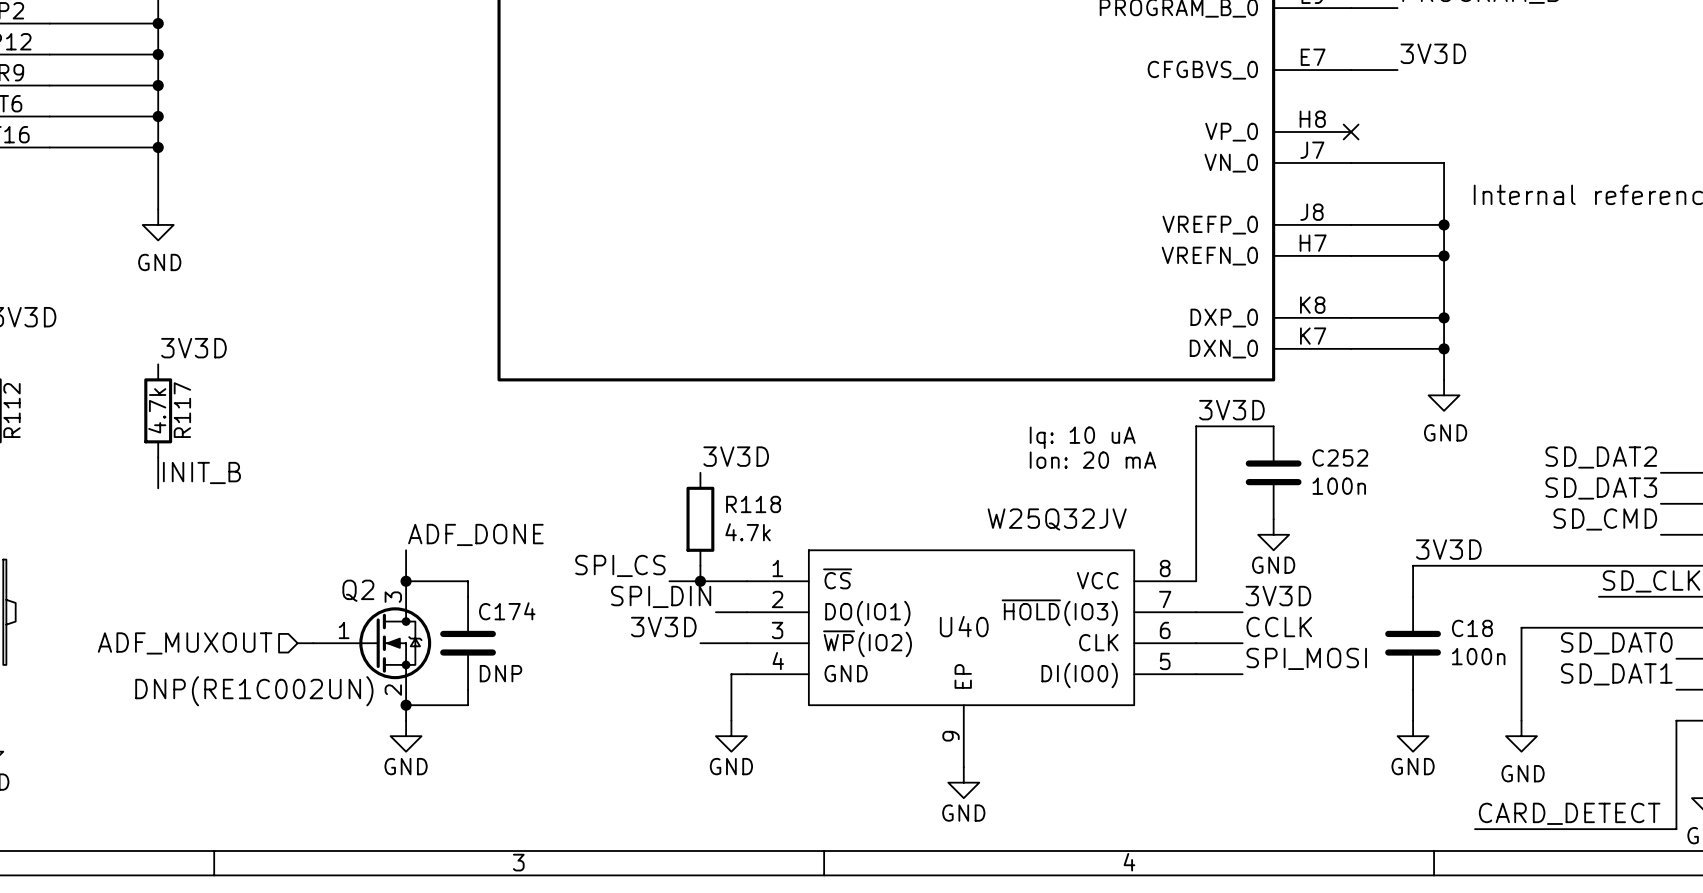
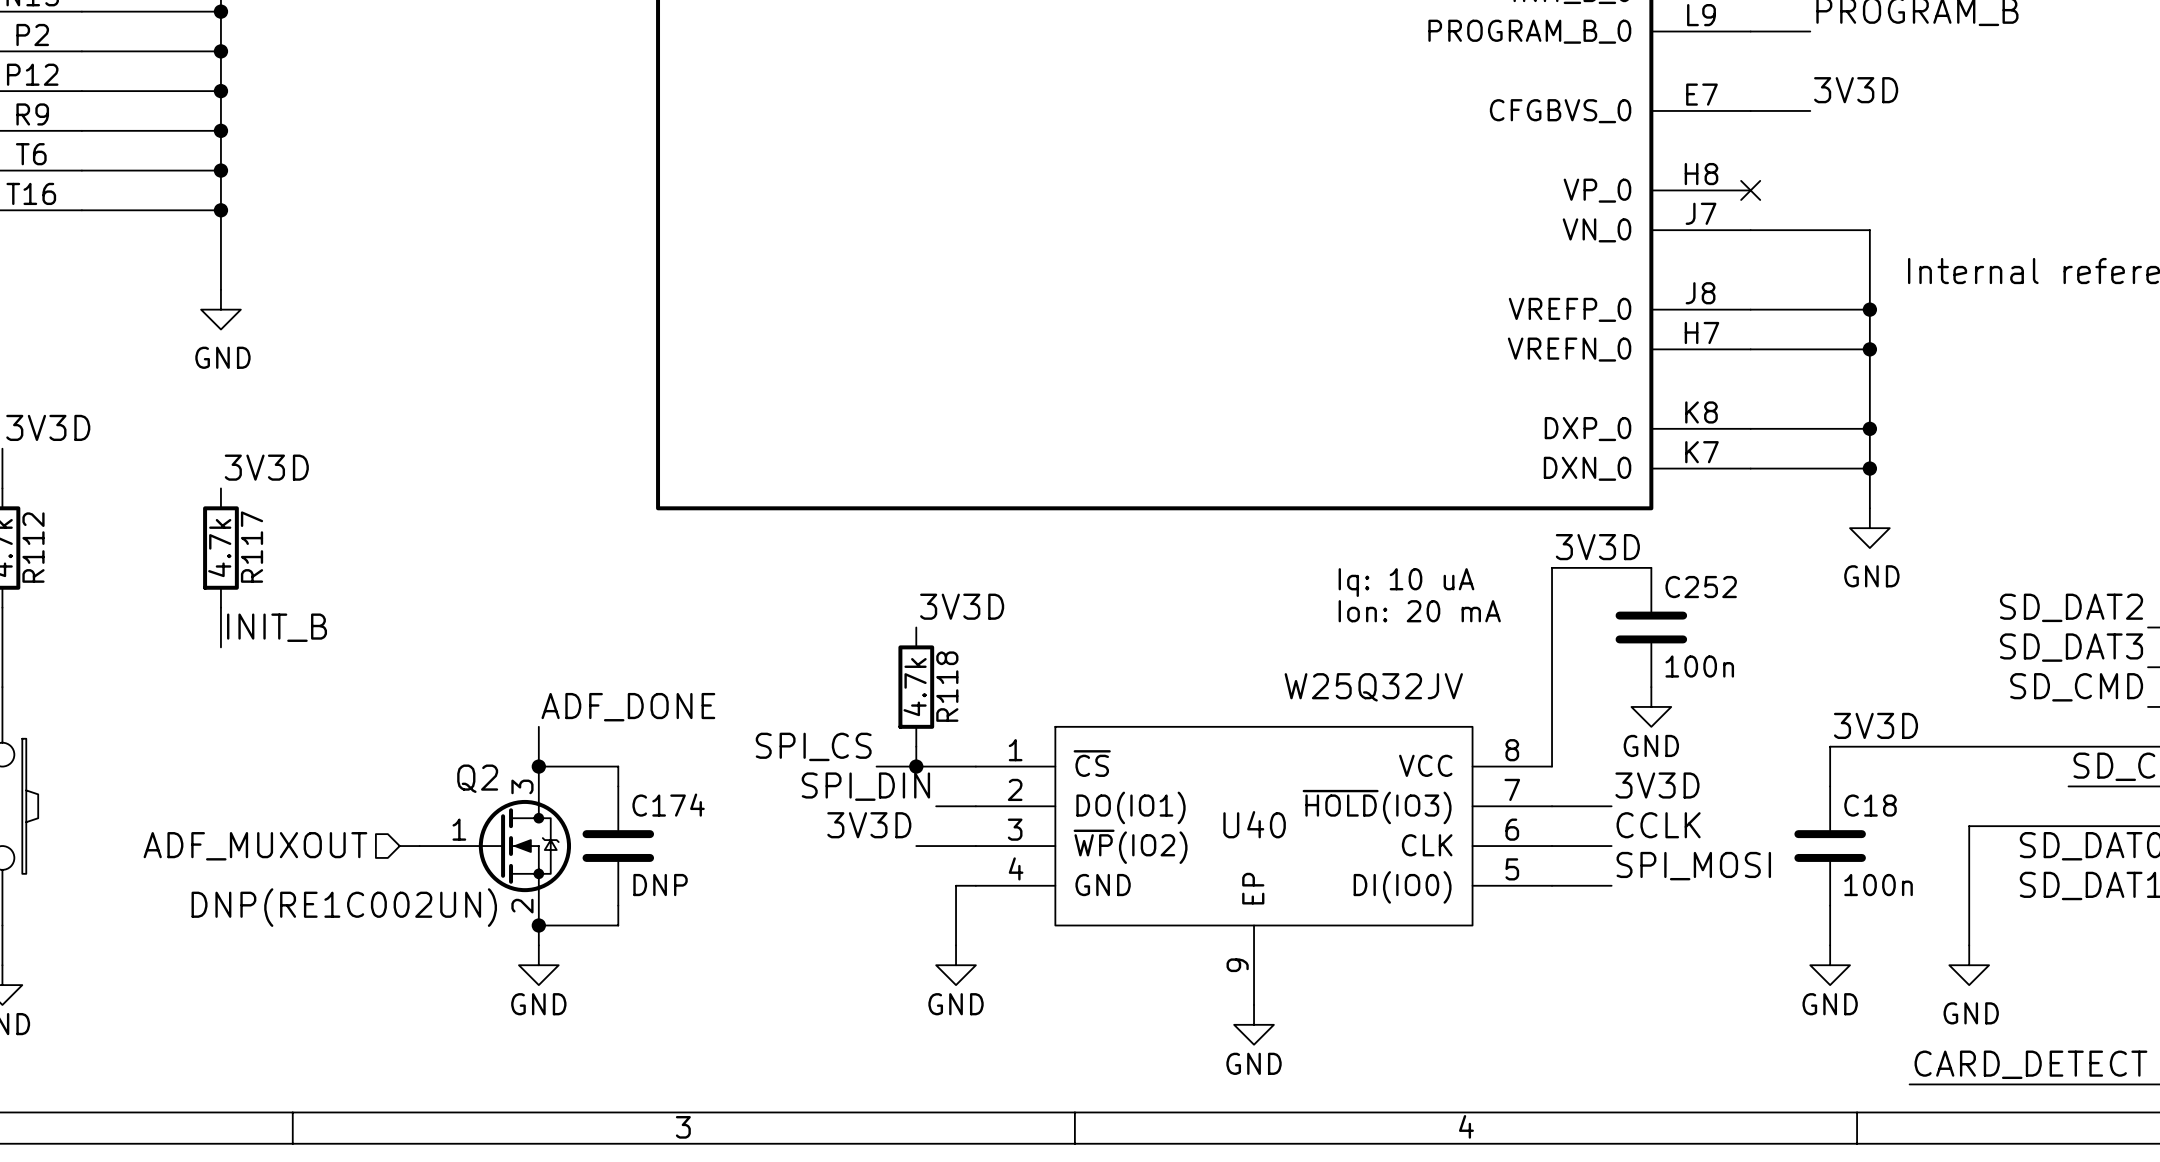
C252 name position: C252 (1340, 457) -> C252 (1701, 587)
C252 value position: 100n (1339, 486) -> 100n (1699, 666)
R118 name rotation: 0° (753, 504) -> 90° counterclockwise (947, 686)
R118 value rotation: 0° (748, 532) -> 90° counterclockwise (915, 687)
C18 name position: C18 (1472, 628) -> C18 (1870, 805)
C18 value position: 100n (1478, 656) -> 100n (1878, 885)

